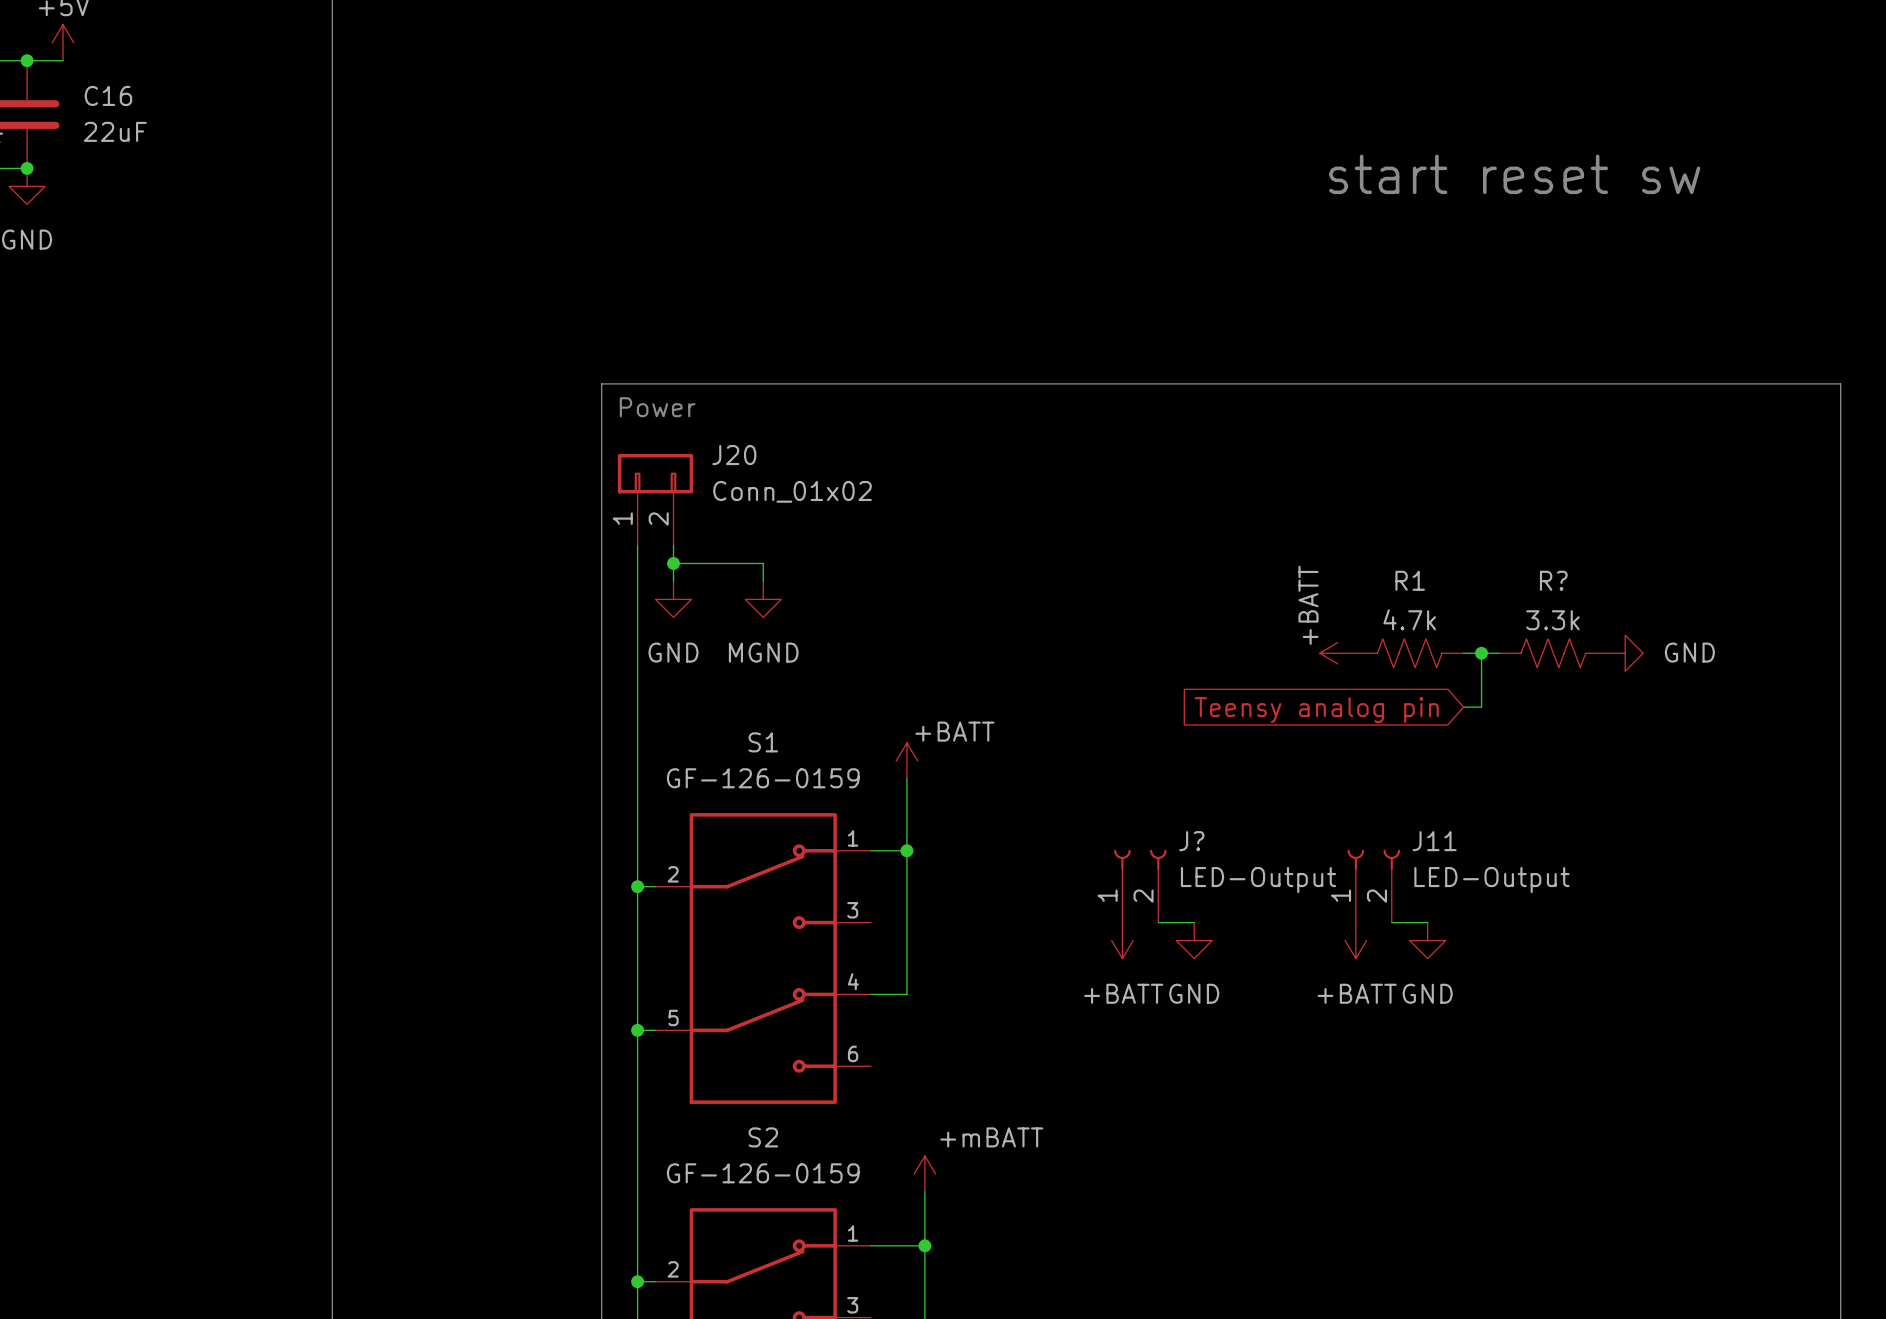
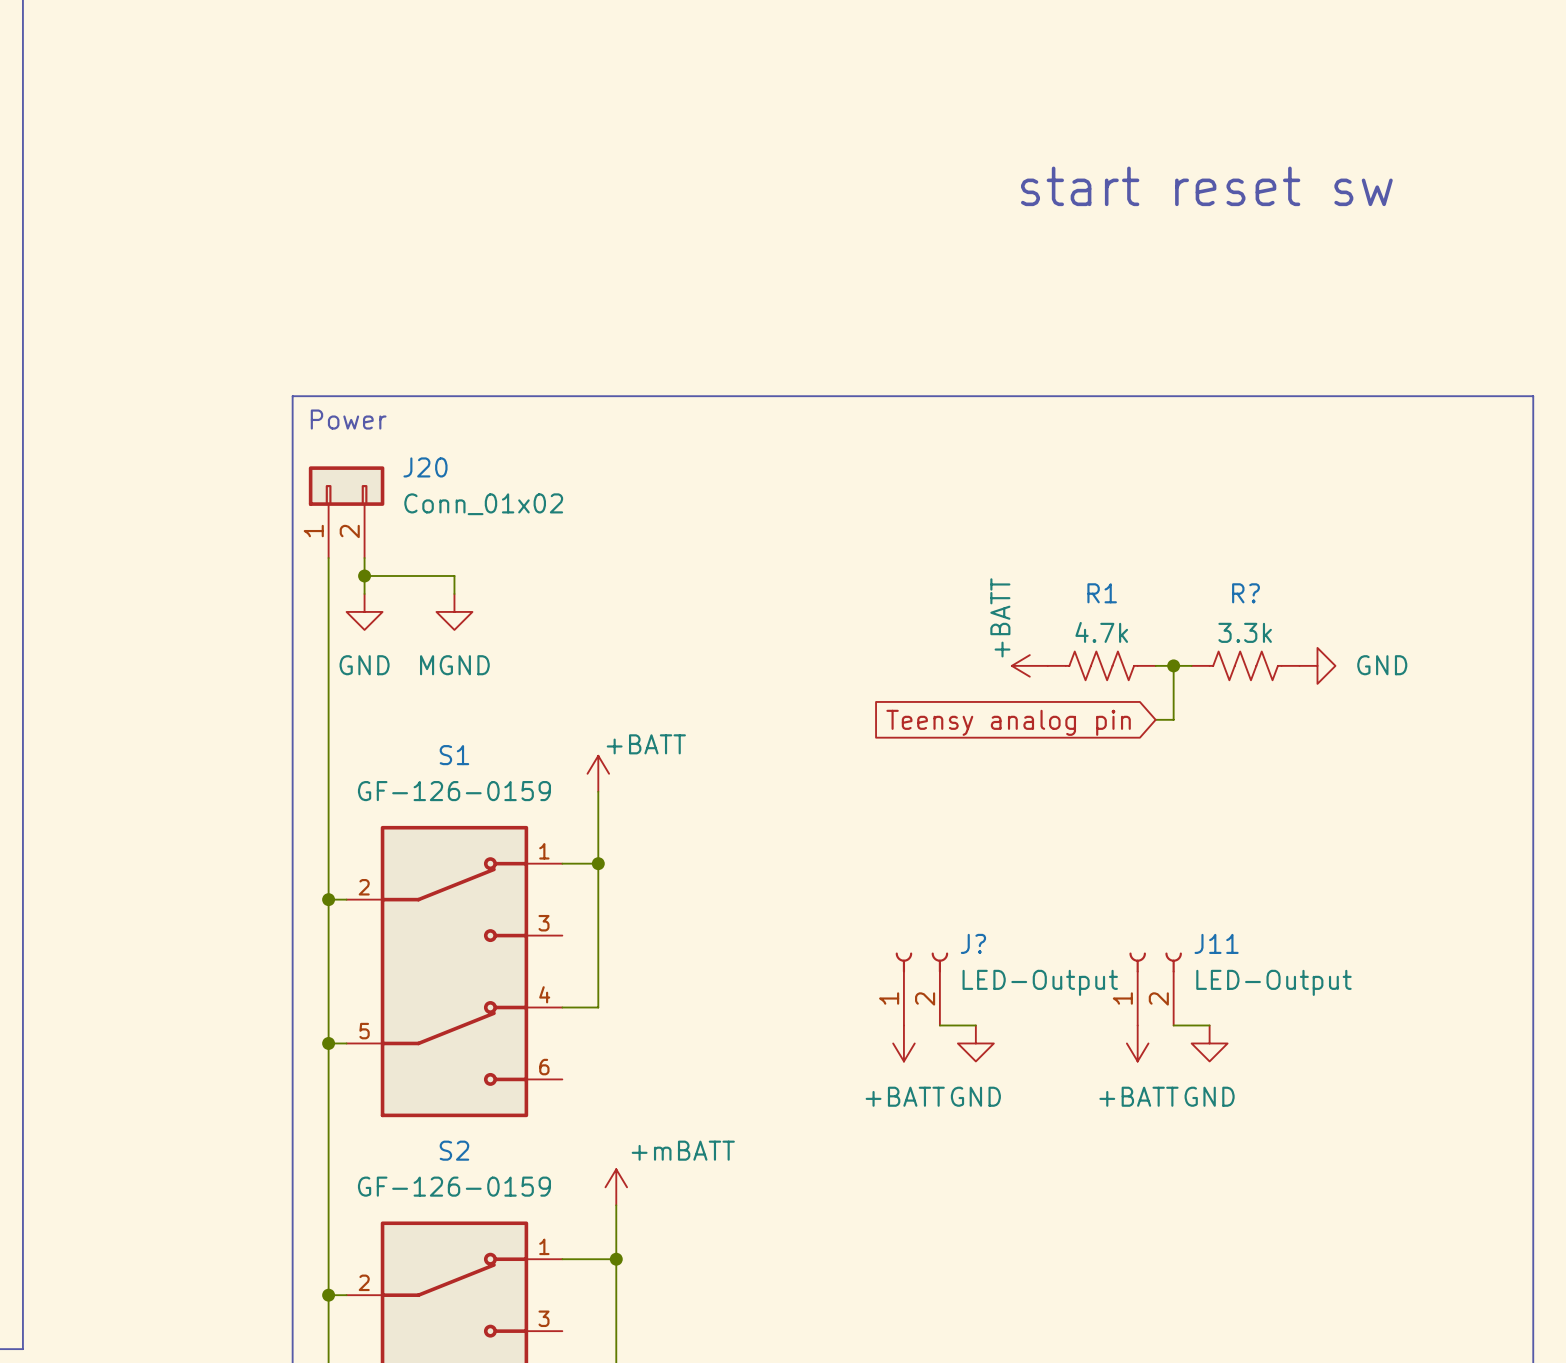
J? position: (1140, 886) -> (921, 988)
J11 position: (1373, 886) -> (1155, 988)
wire: (1158, 922) (1194, 922) -> (939, 1025) (975, 1025)
wire: (1391, 922) (1427, 922) -> (1173, 1025) (1209, 1025)
power symbol: +BATT (1122, 940) -> none
power symbol: GND (1194, 940) -> none
power symbol: +BATT (1355, 940) -> none
power symbol: GND (1427, 940) -> none
power symbol: none -> +BATT (903, 1043)
power symbol: none -> GND (975, 1043)
power symbol: none -> +BATT (1137, 1043)
power symbol: none -> GND (1209, 1043)

